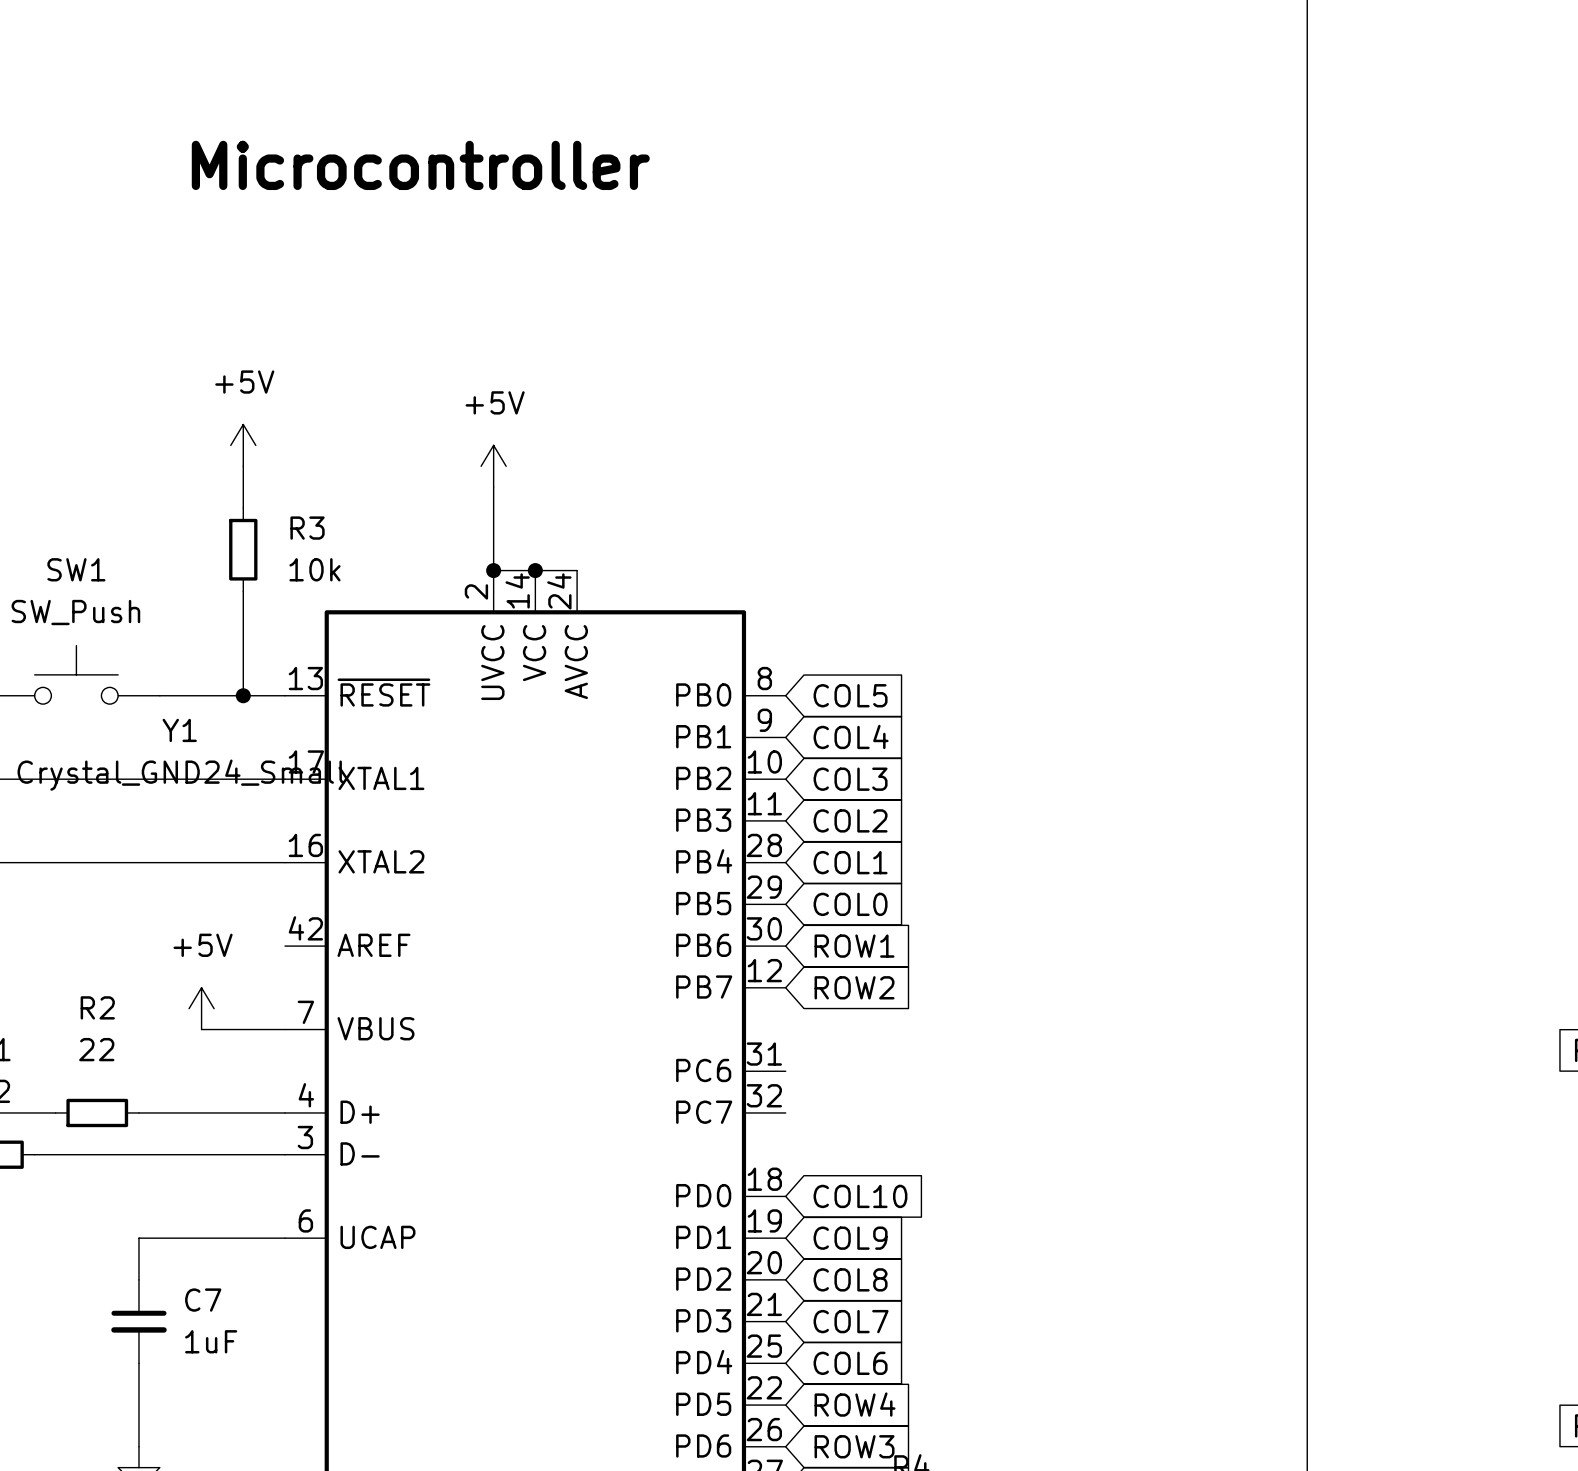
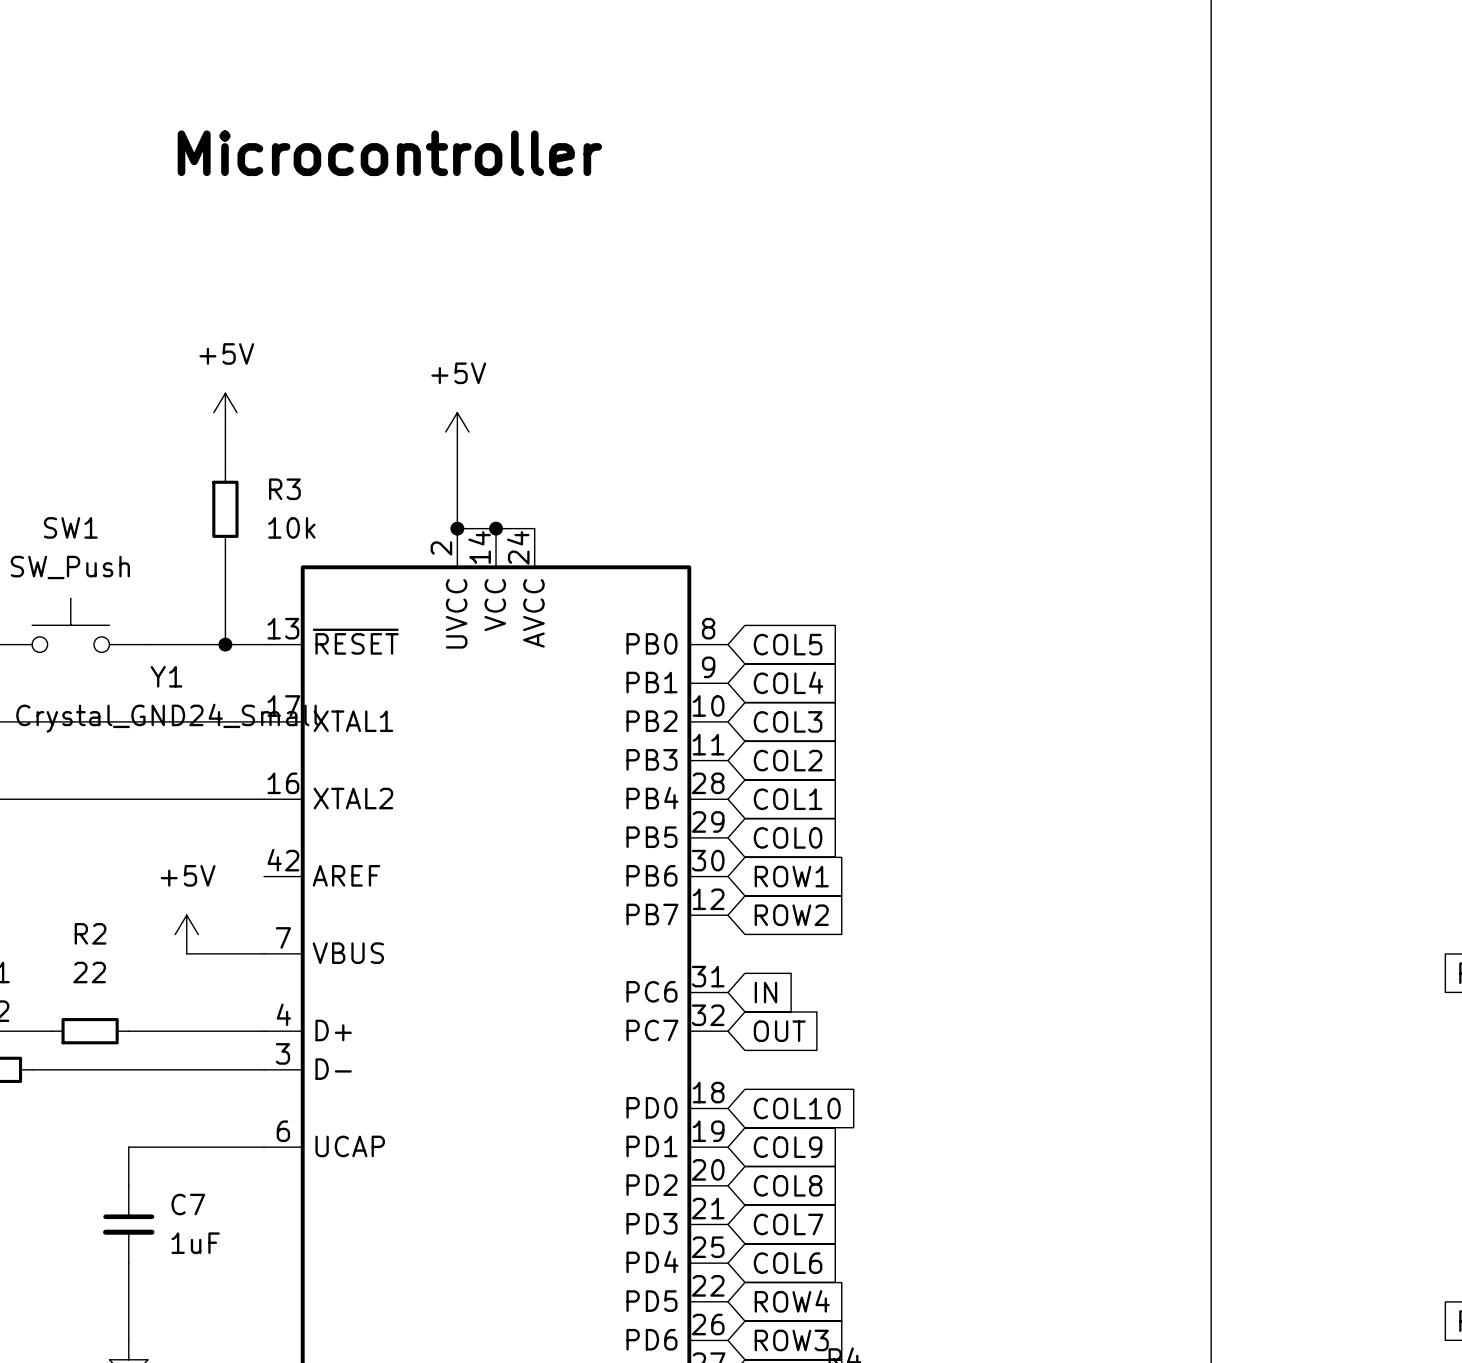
global label: none -> IN (765, 992)
global label: none -> OUT (779, 1031)

